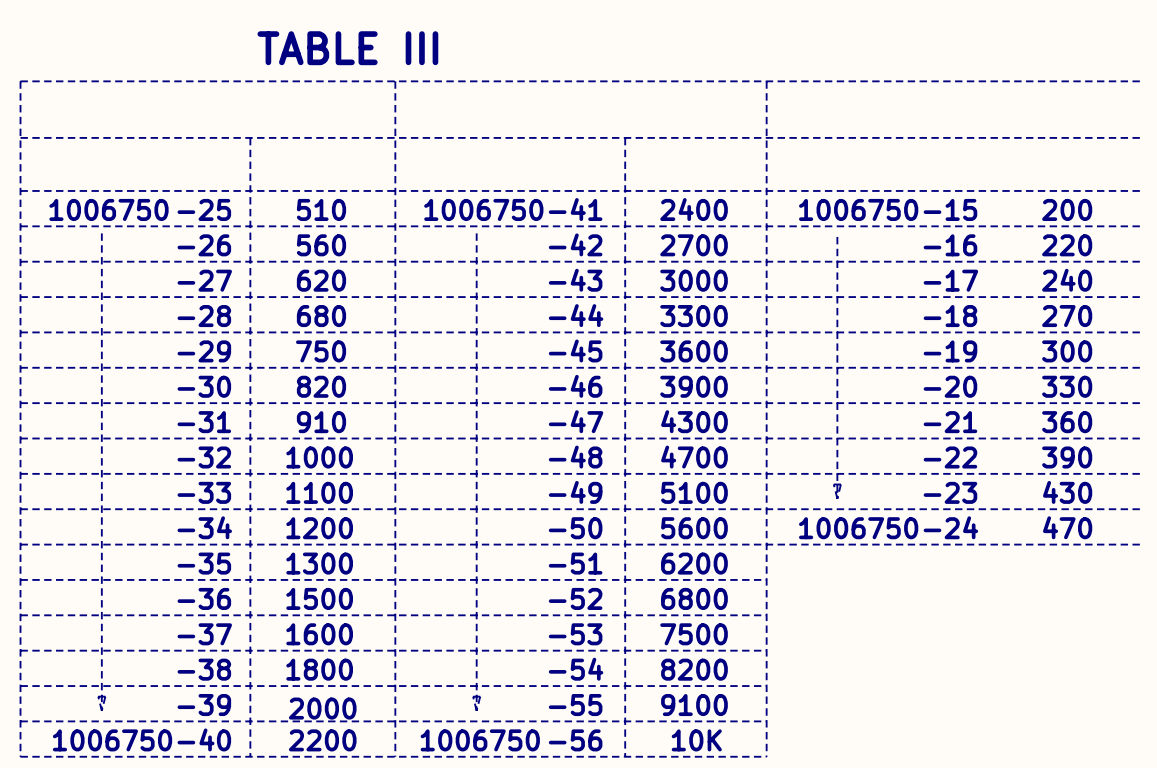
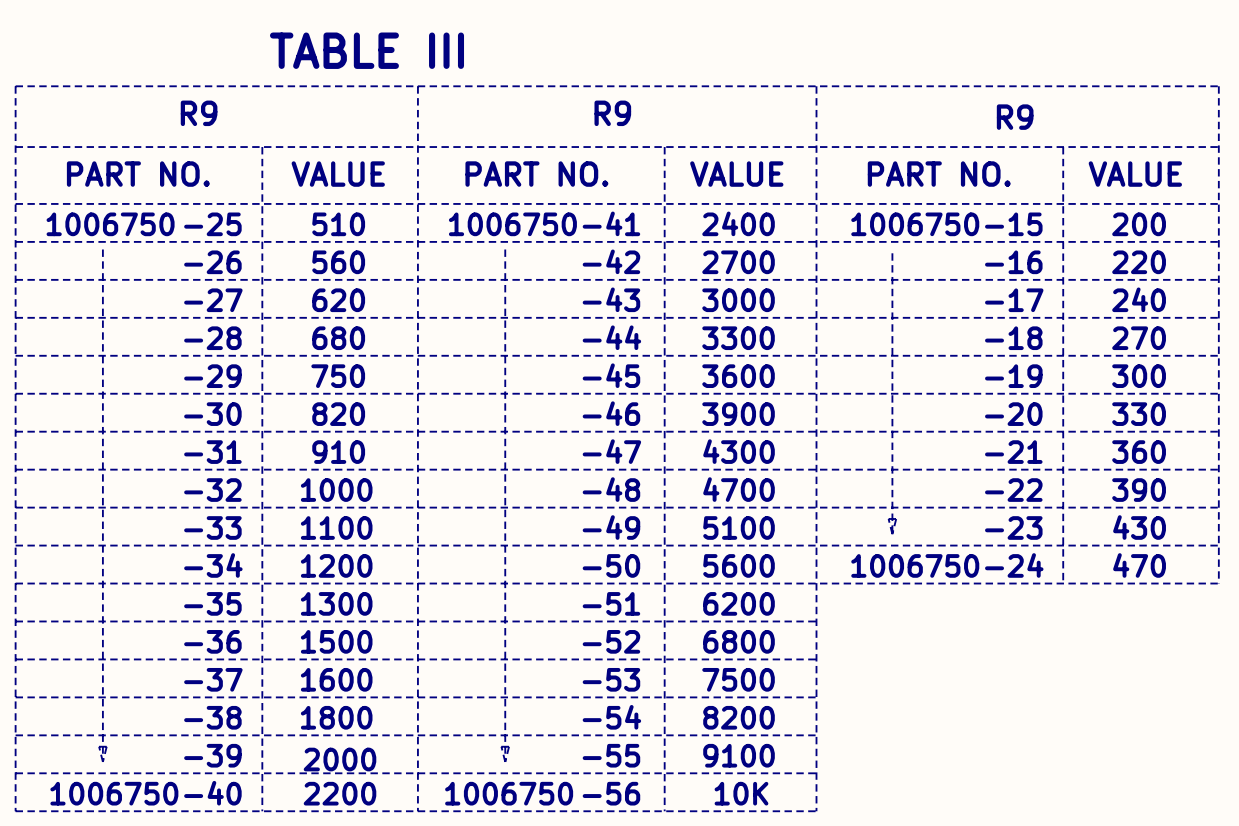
line: none -> (1218, 86) (1218, 583)
text: none -> R9 (199, 113)
text: none -> R9 (612, 113)
text: none -> R9 (1015, 117)
line: none -> (1063, 147) (1063, 583)
text: none -> PART NO. (138, 174)
text: none -> VALUE (338, 174)
text: none -> PART NO. (536, 174)
text: none -> VALUE (736, 174)
text: none -> PART NO. (939, 174)
text: none -> VALUE (1135, 174)

